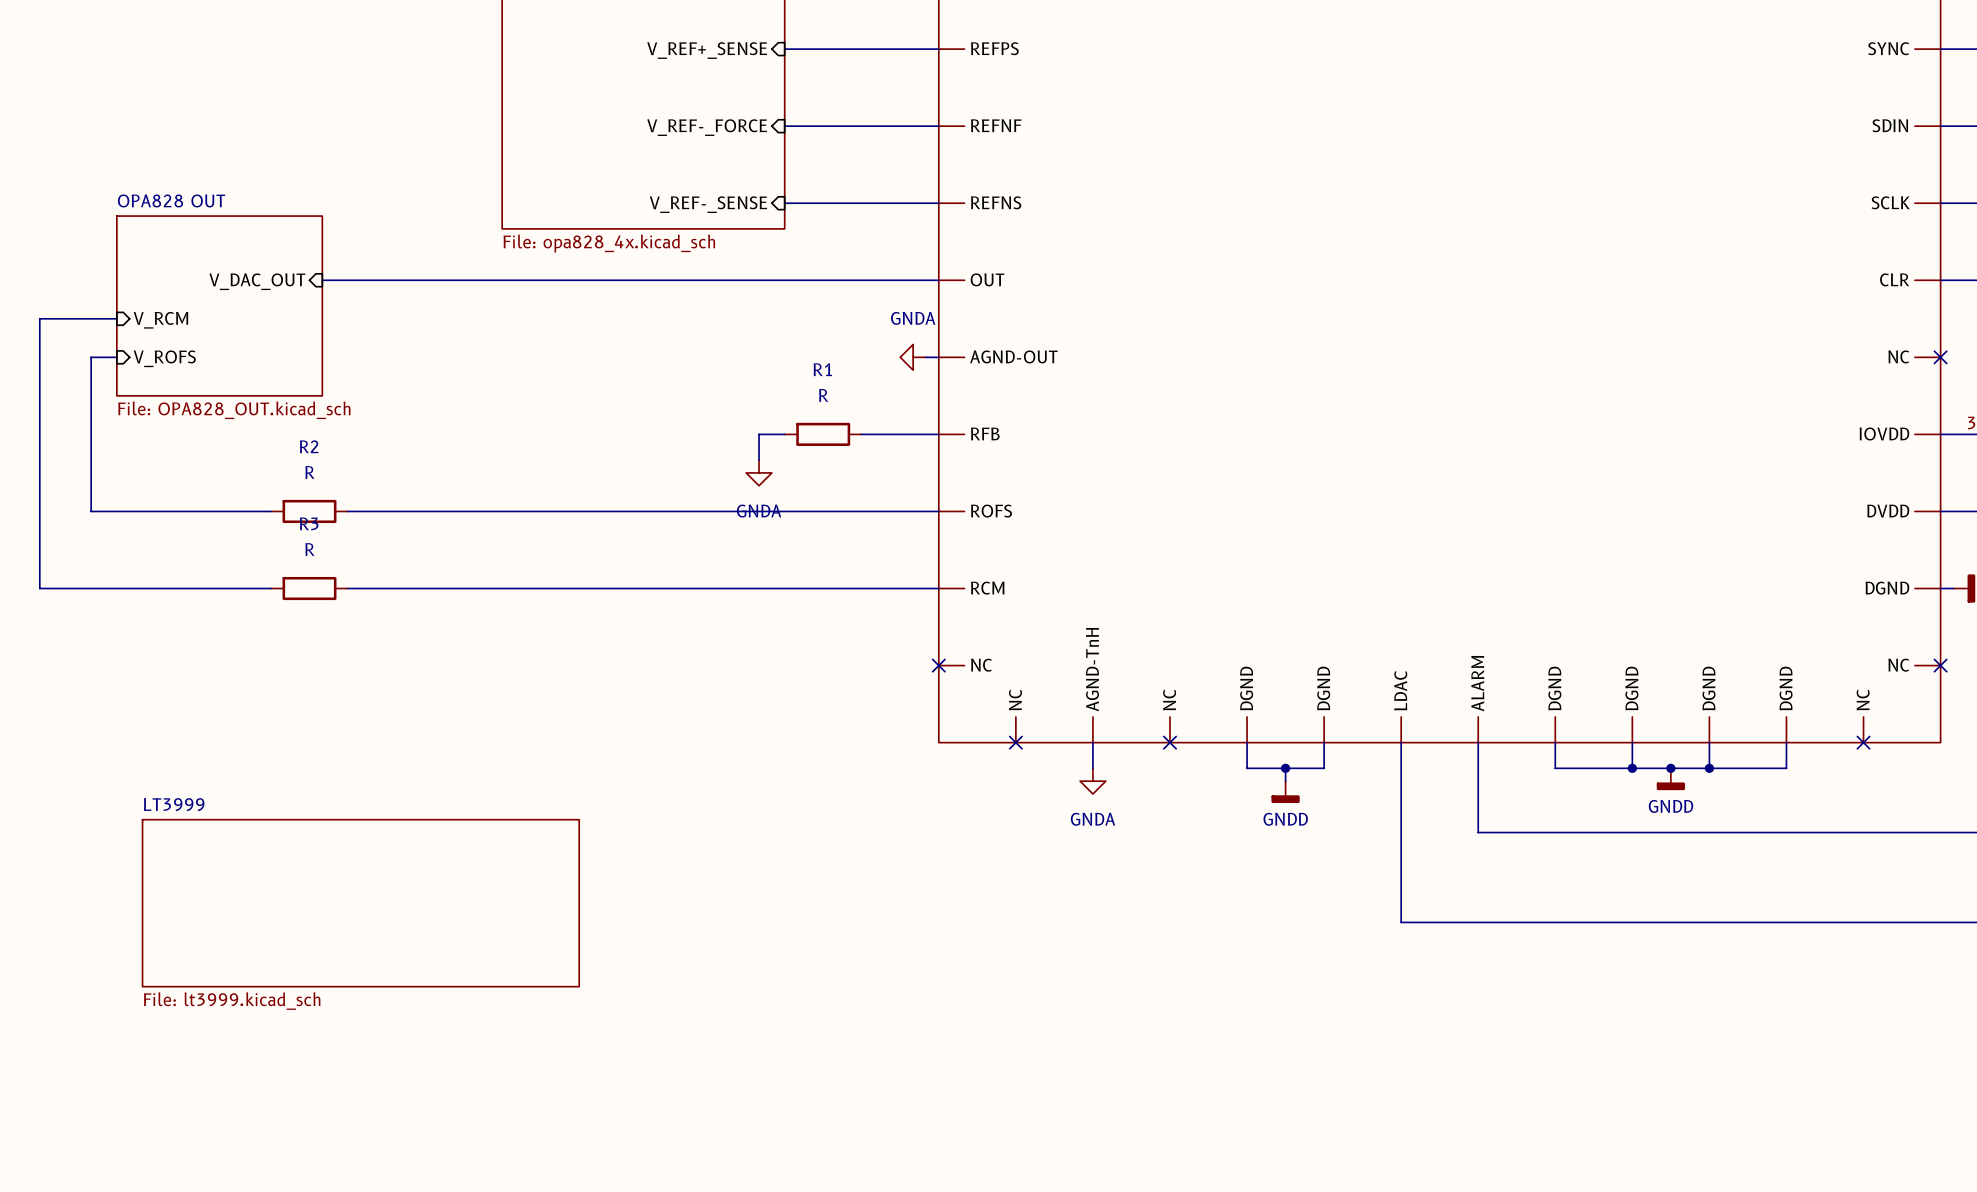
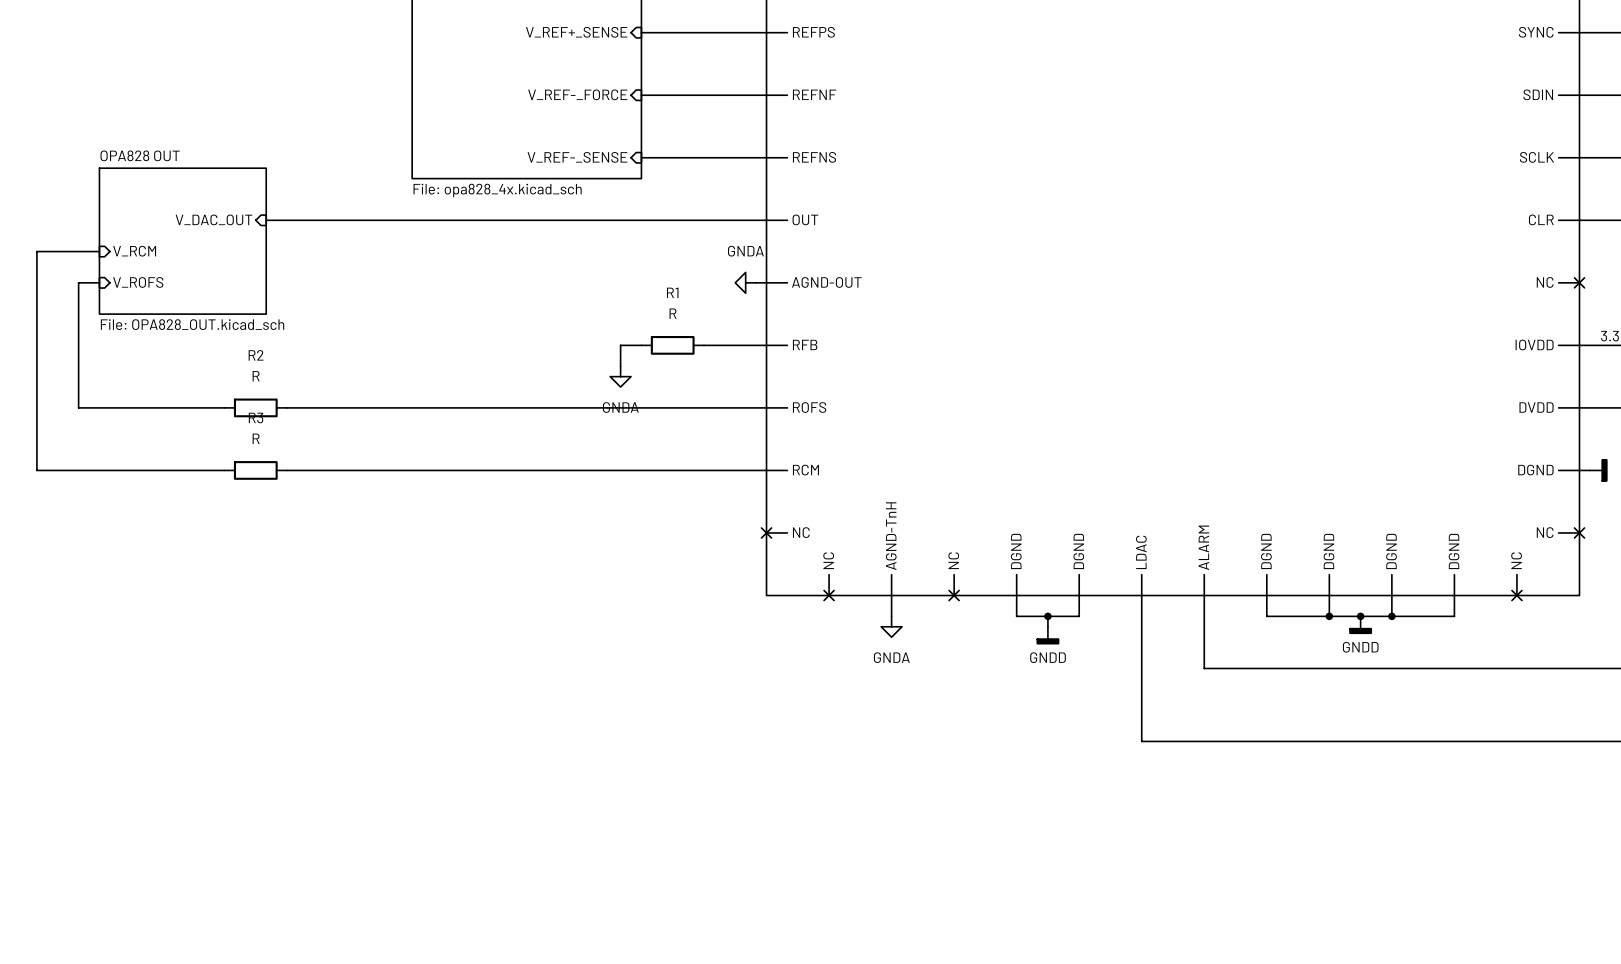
sheet LT3999: File: lt3999.kicad_sch (360, 903) -> none

